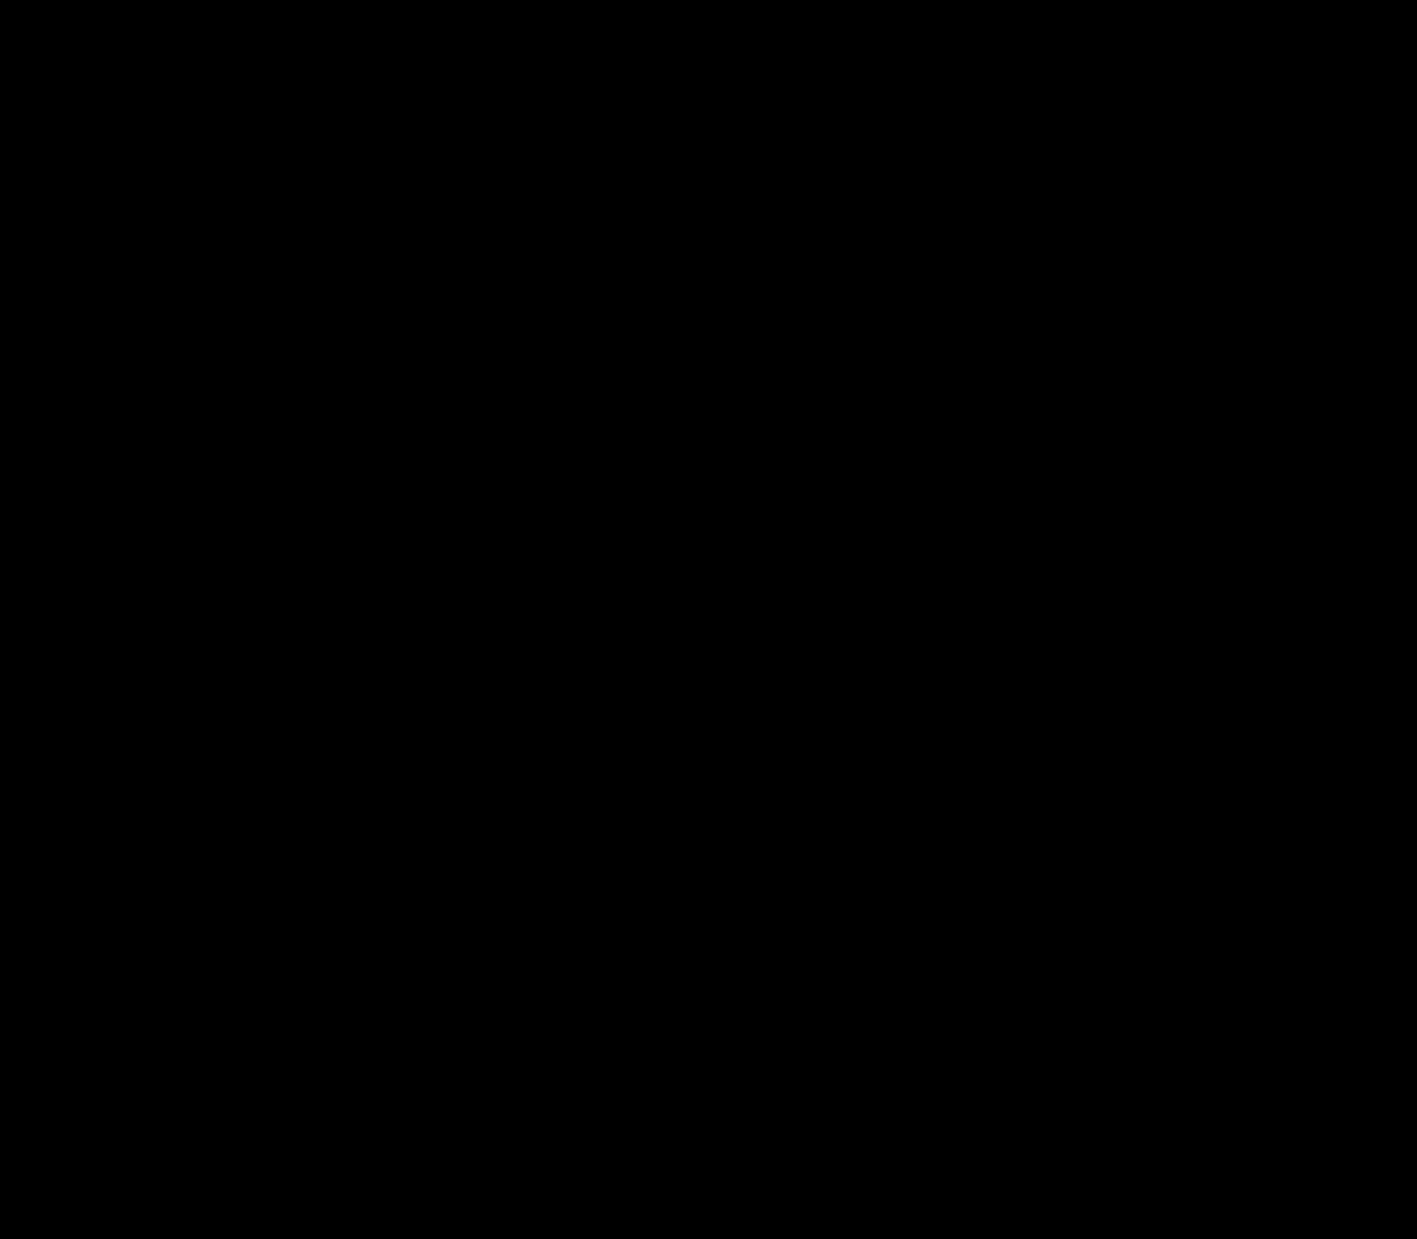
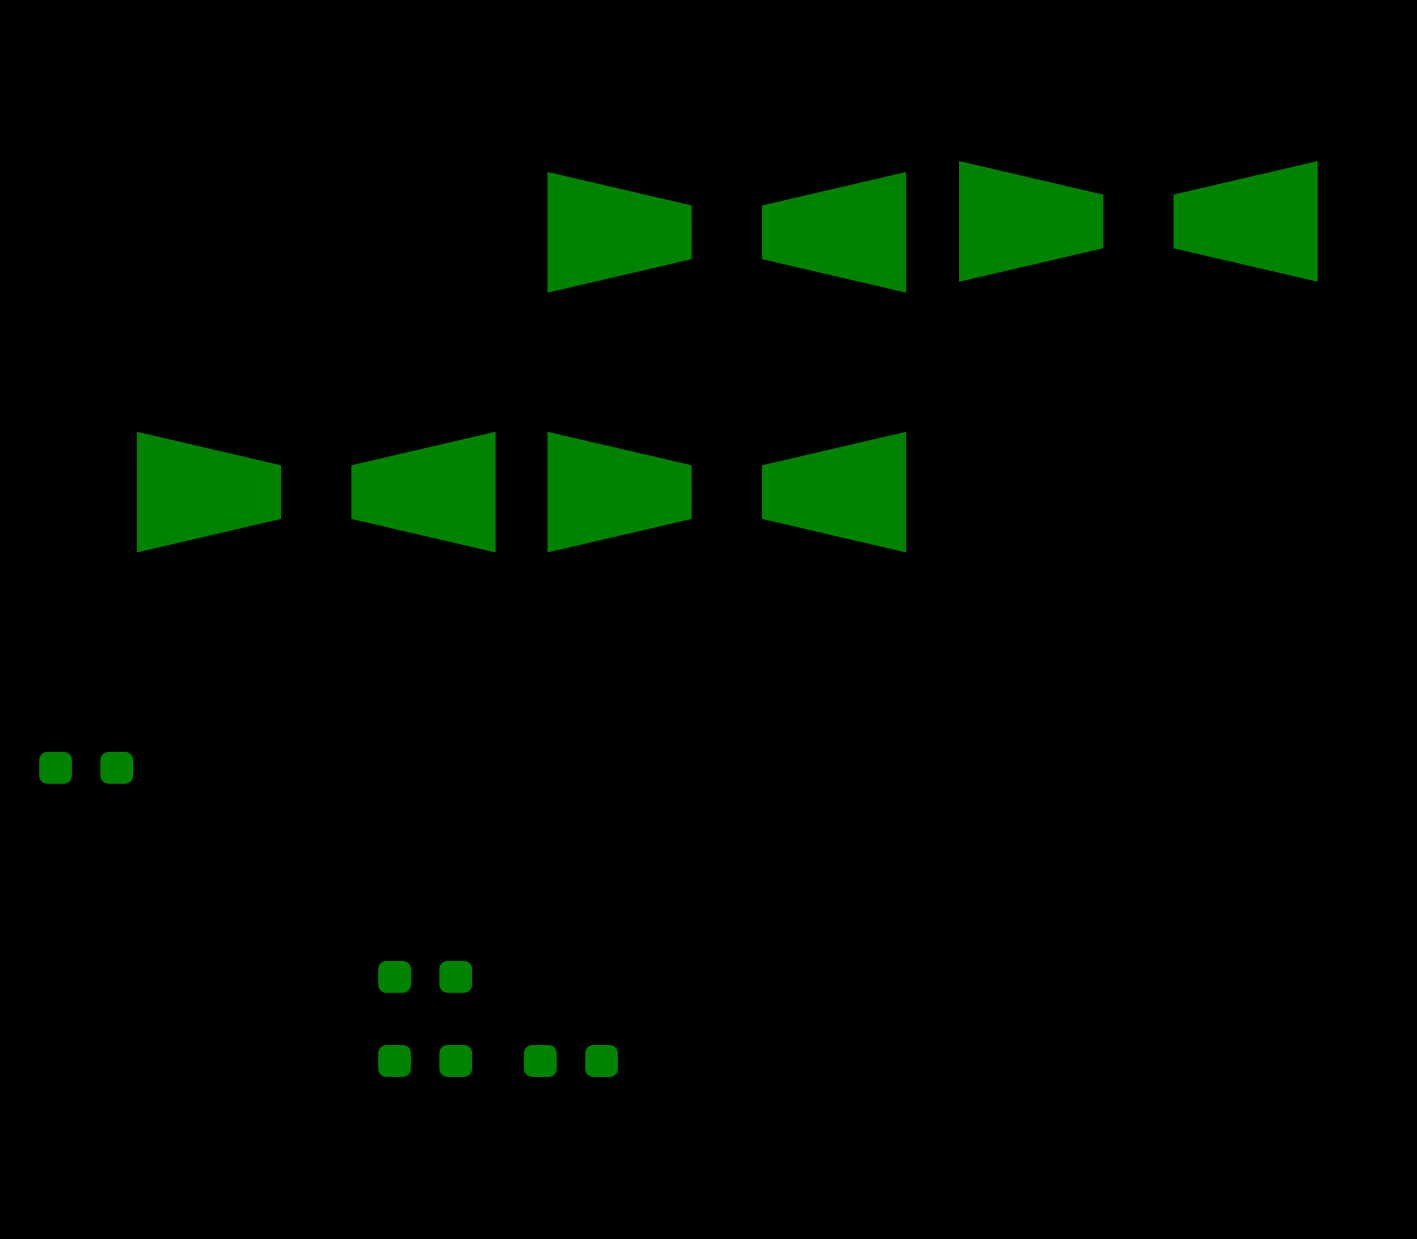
part: none -> (1138, 221)
part: none -> (726, 232)
part: none -> (316, 492)
part: none -> (726, 492)
part: none -> (86, 767)
part: none -> (425, 976)
part: none -> (425, 1060)
part: none -> (570, 1060)

